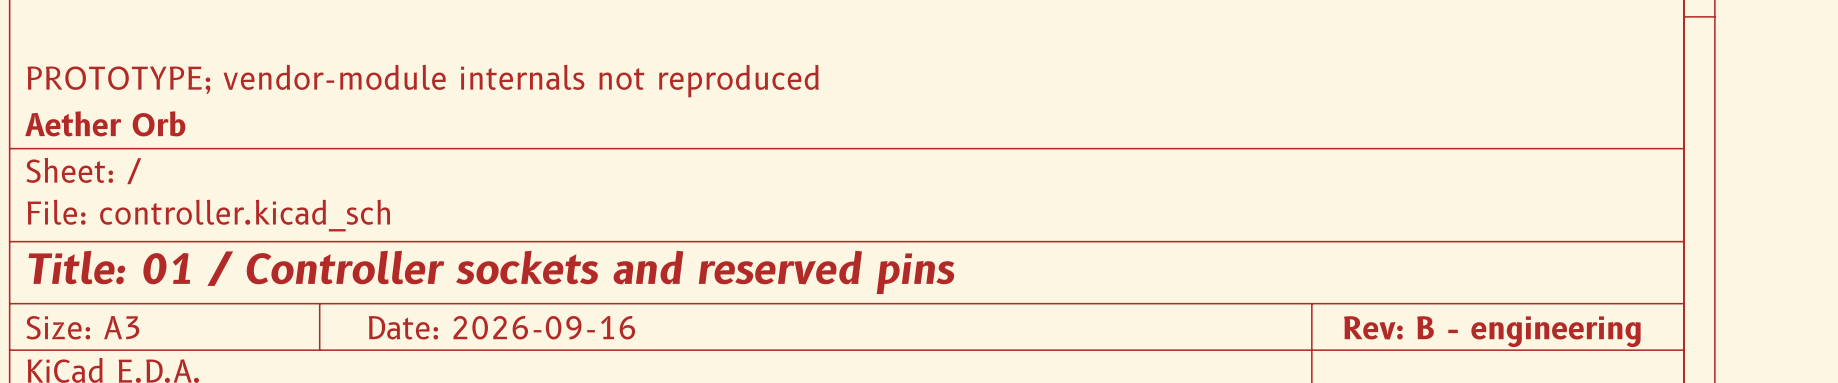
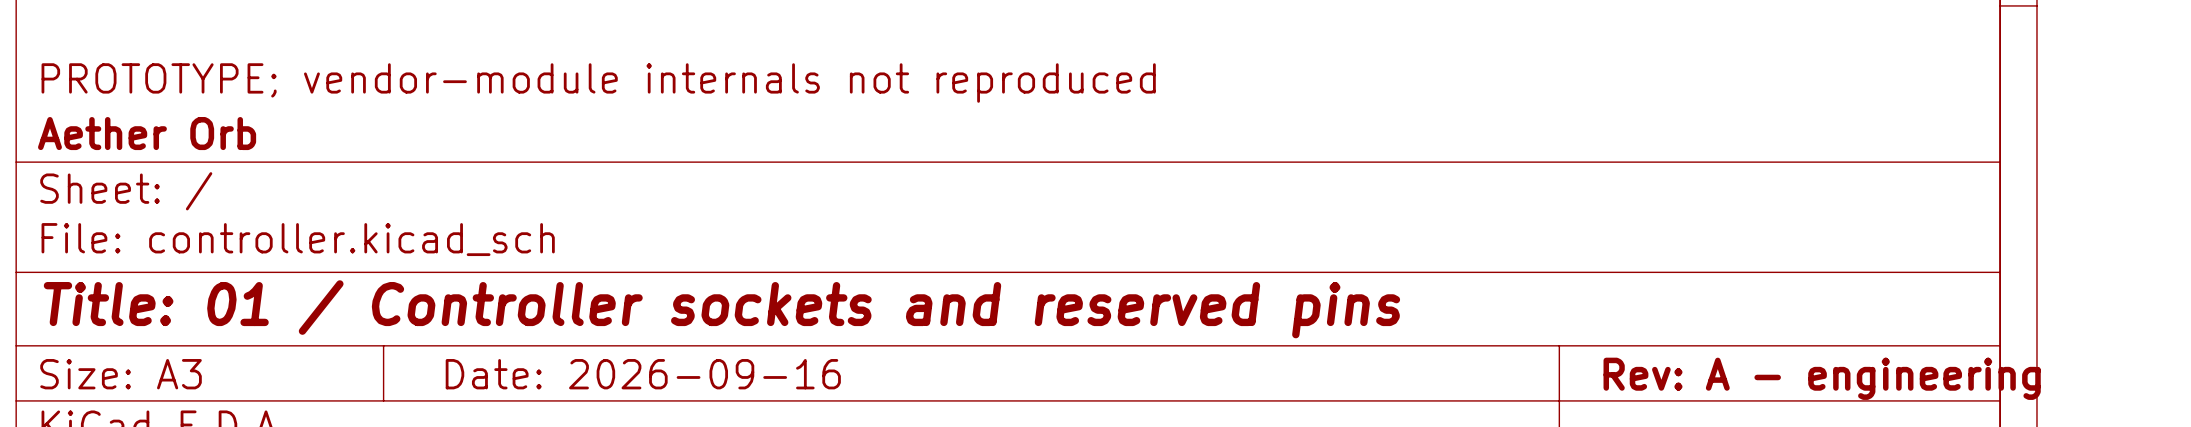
title block: Rev: B - engineering (1492, 331) -> Rev: A - engineering (1822, 378)

